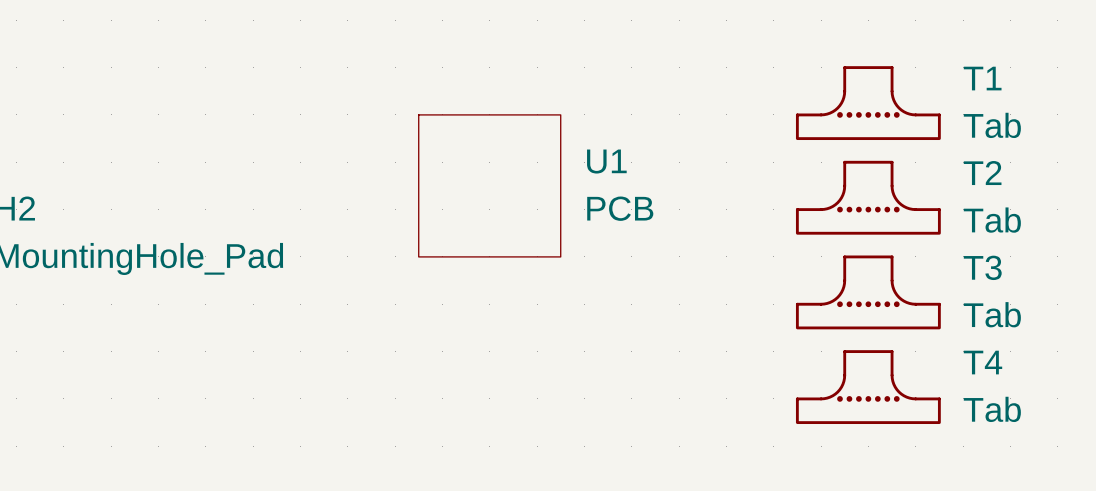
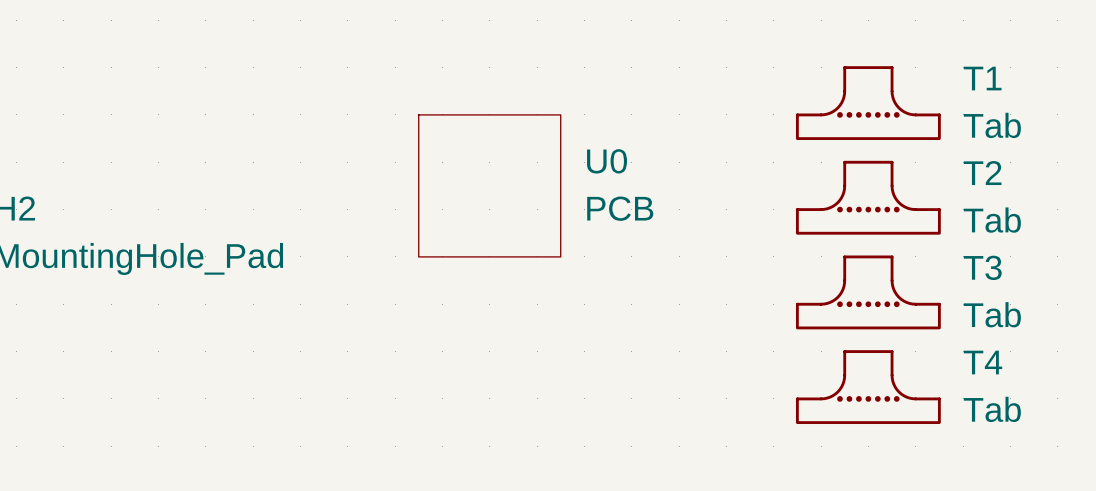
U1 name: U1 (606, 161) -> U0 (607, 161)

